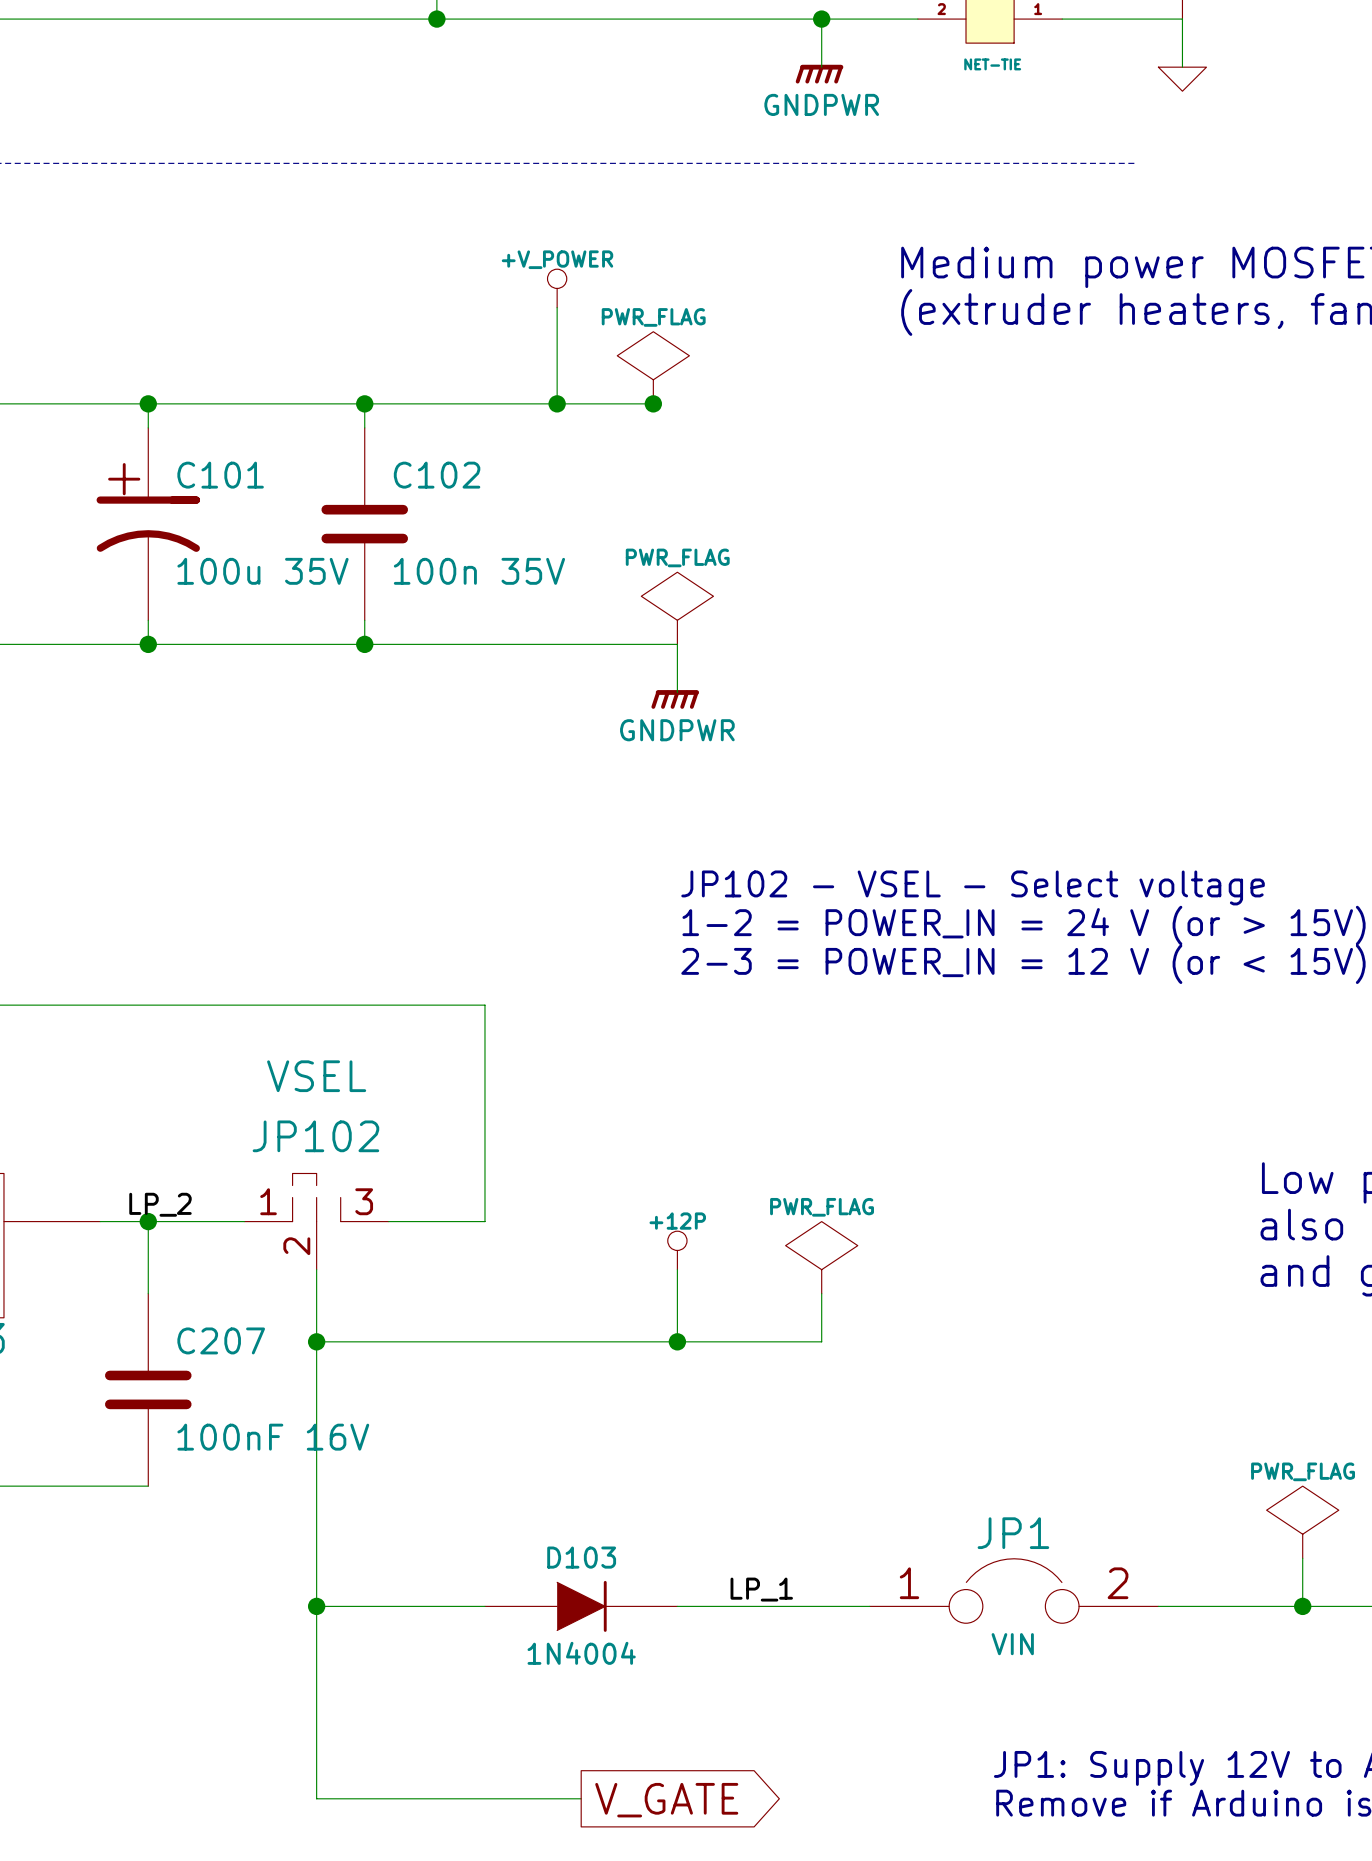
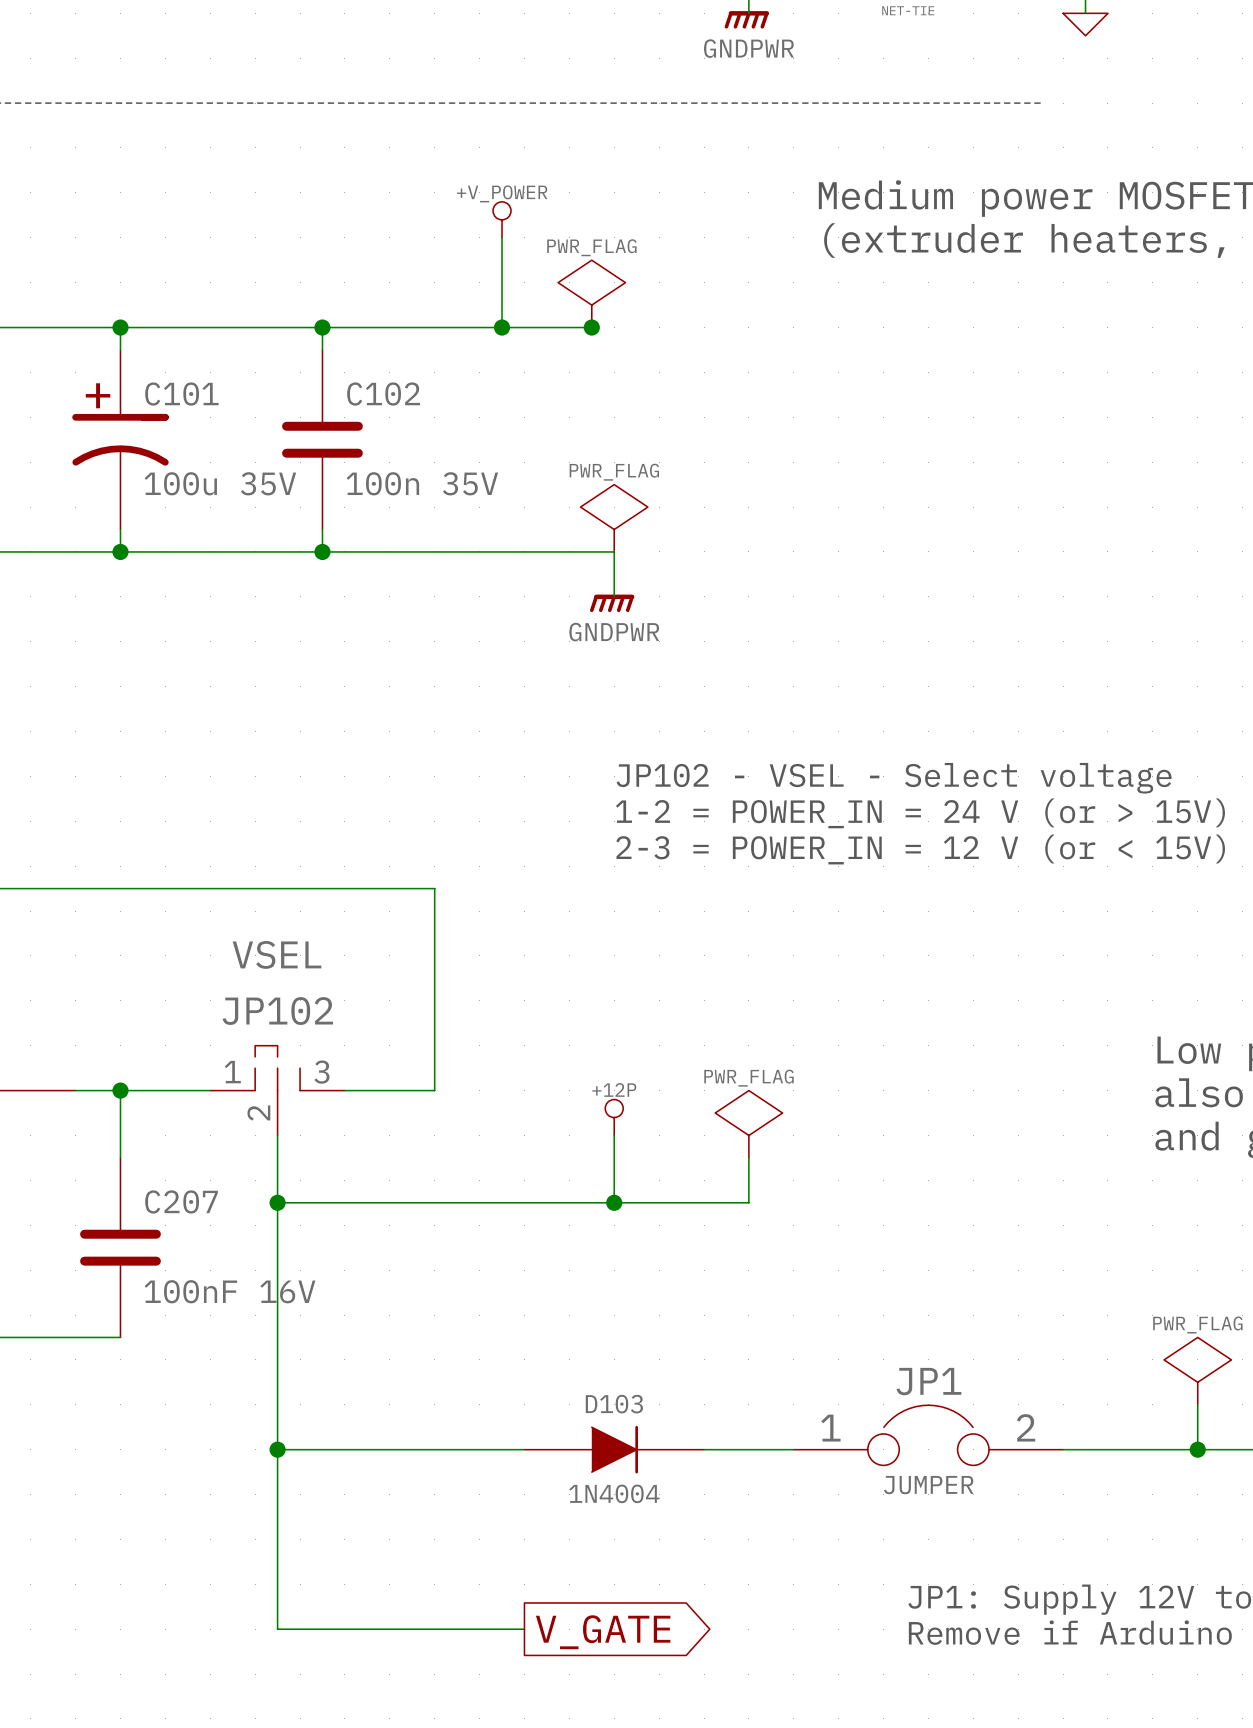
label: LP_2 (160, 1204) -> none
label: LP_1 (761, 1589) -> none
D103 position: (581, 1606) -> (614, 1449)
JP1 value: VIN (1012, 1644) -> JUMPER (928, 1485)

